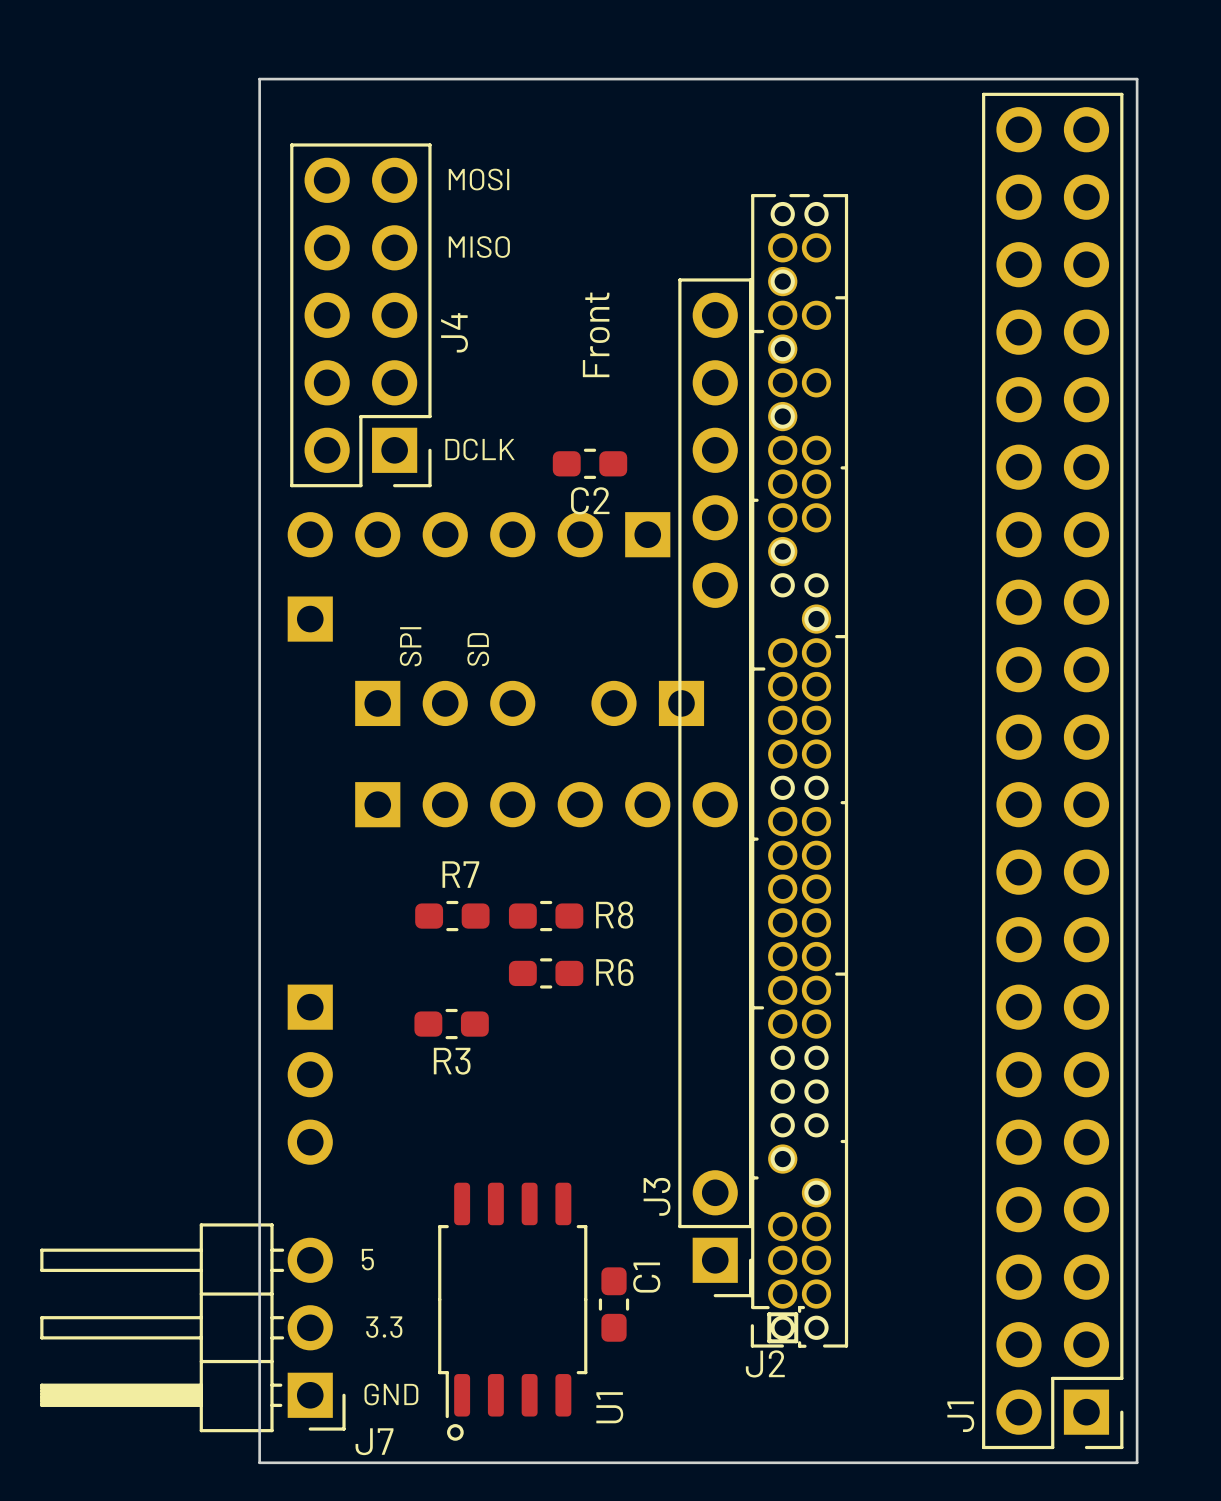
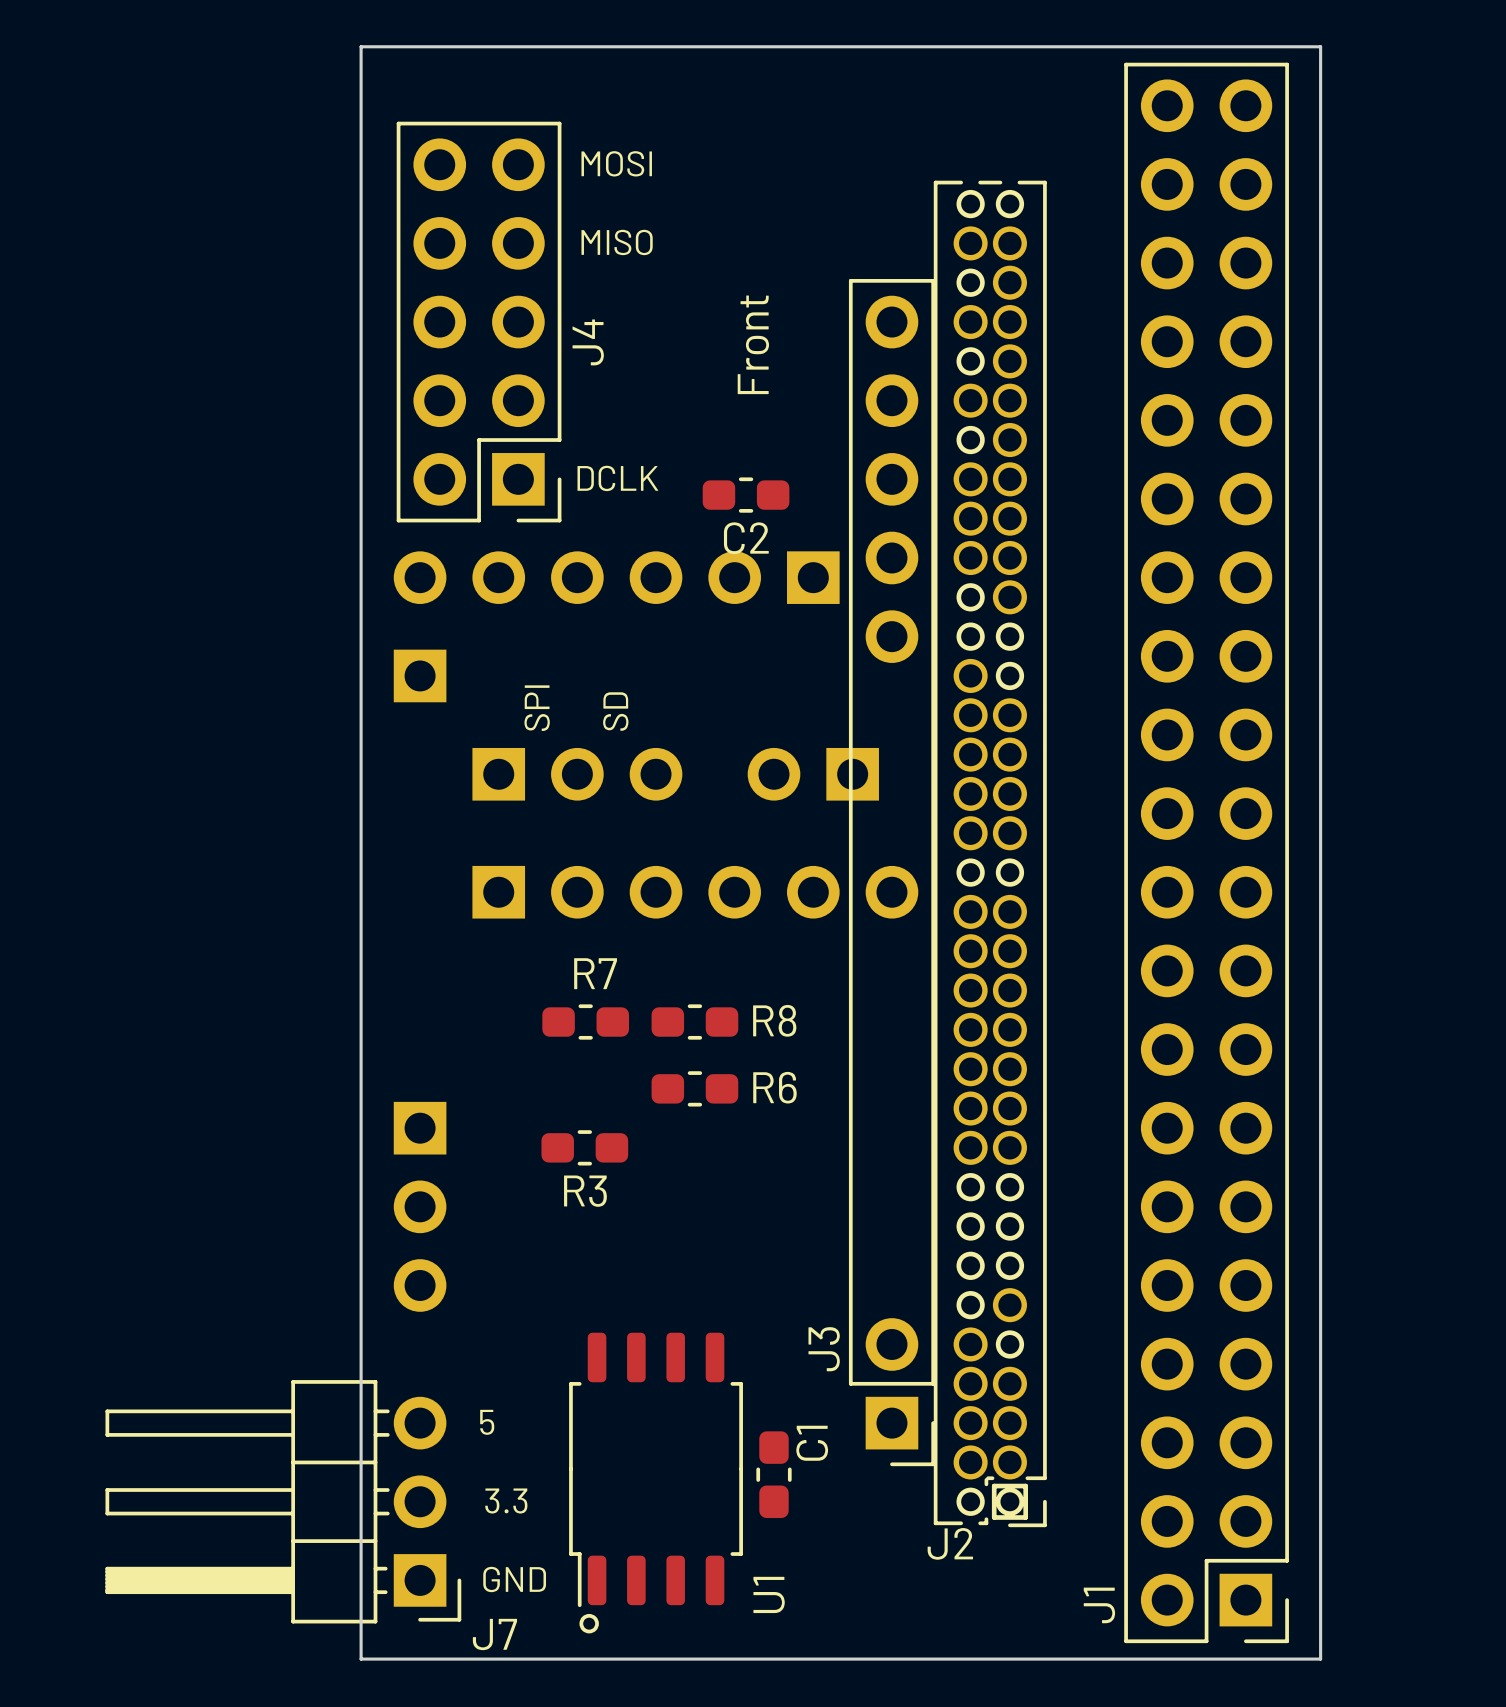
board edge: (1083, 79) (1137, 79) (1137, 1462) (1083, 1462) -> (1320, 46) (1320, 1659)
J2 footprint: [750, 194, 849, 1348] -> [933, 180, 1047, 1528]
J1 position: (1052, 770) -> (1206, 852)

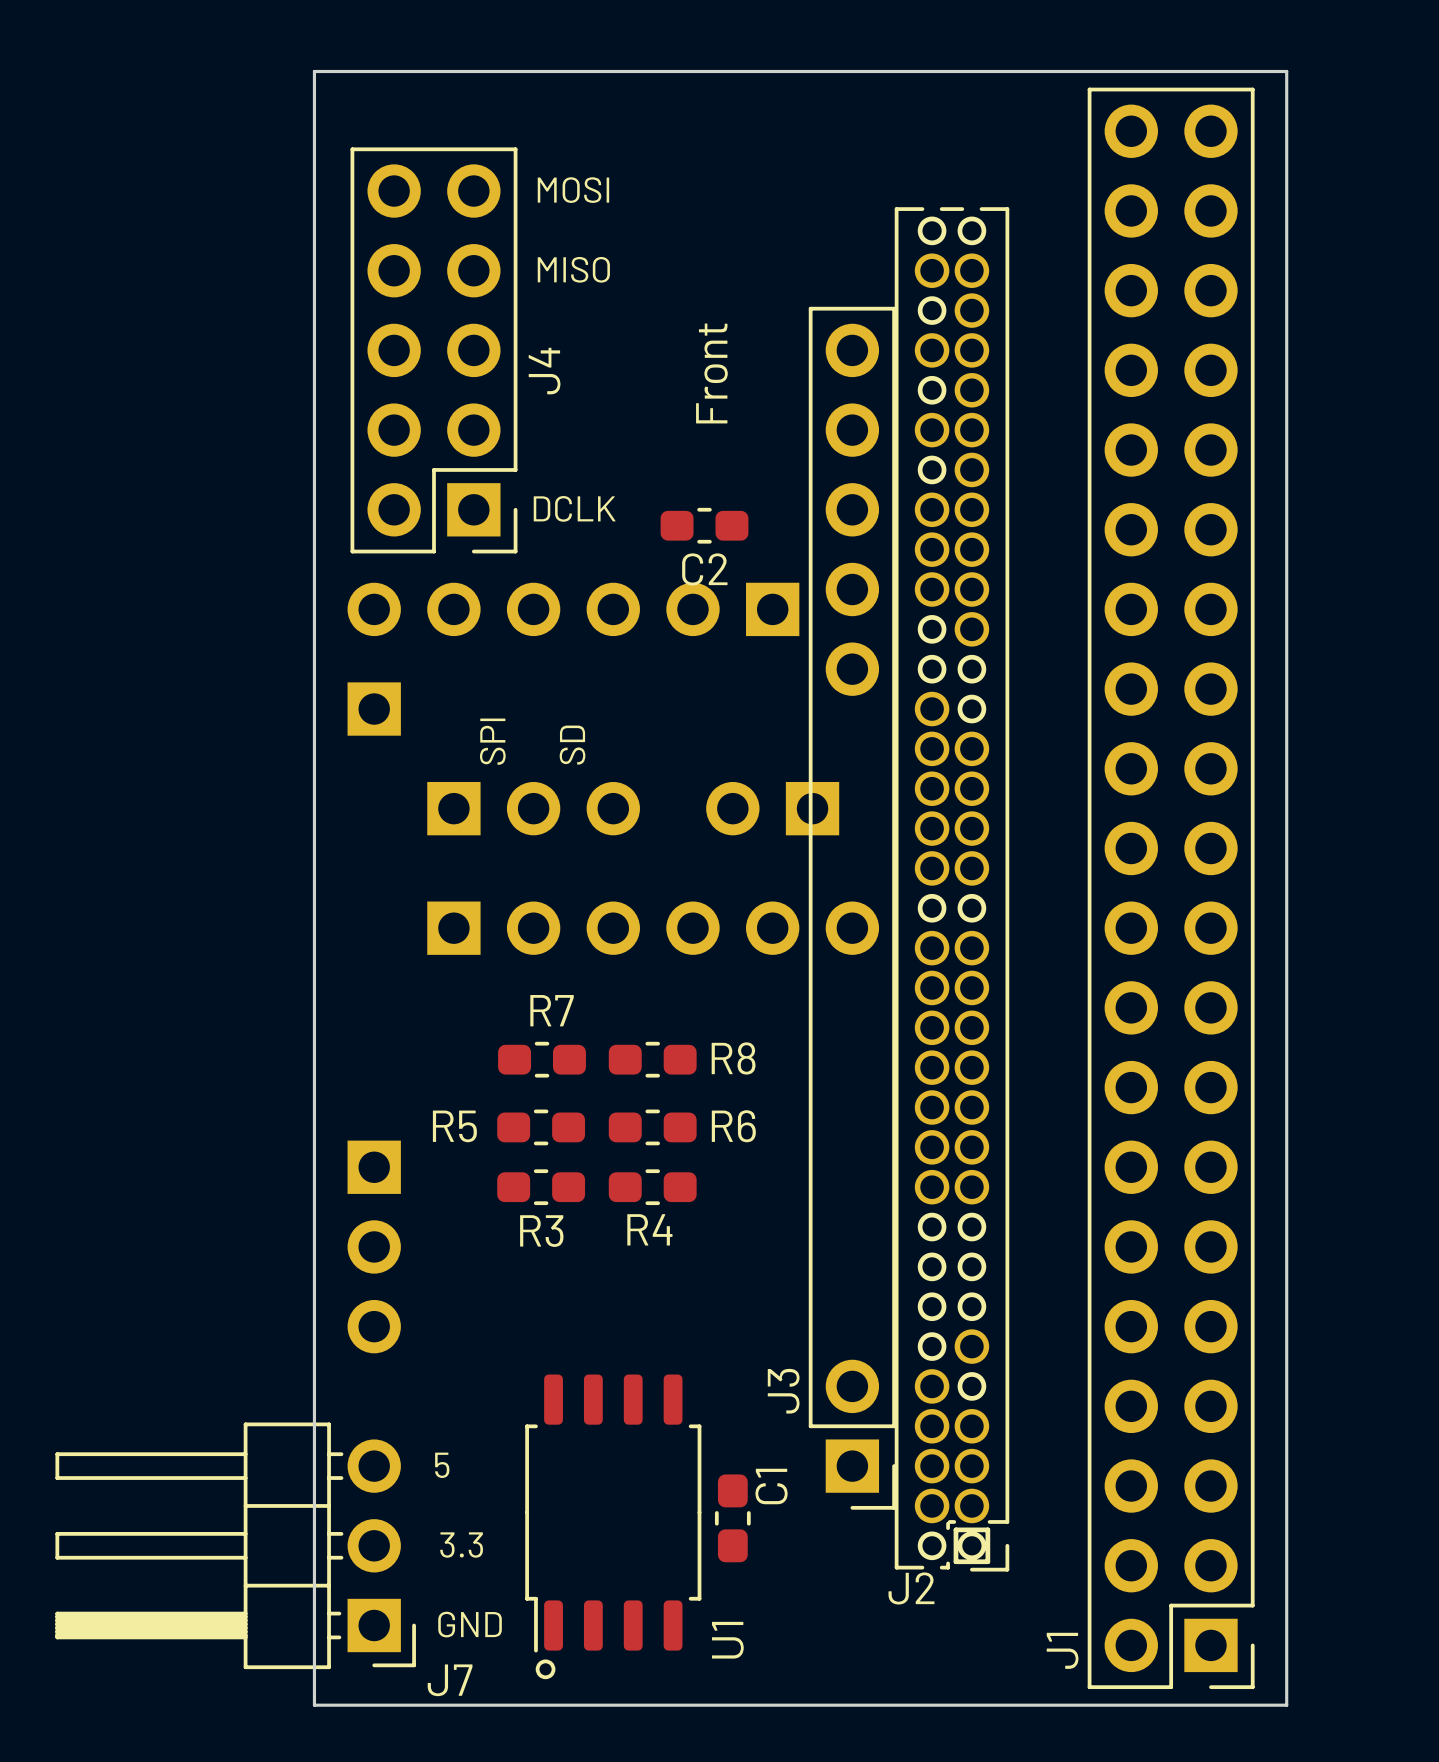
R5: none -> (541, 1127)
R4: none -> (652, 1187)

